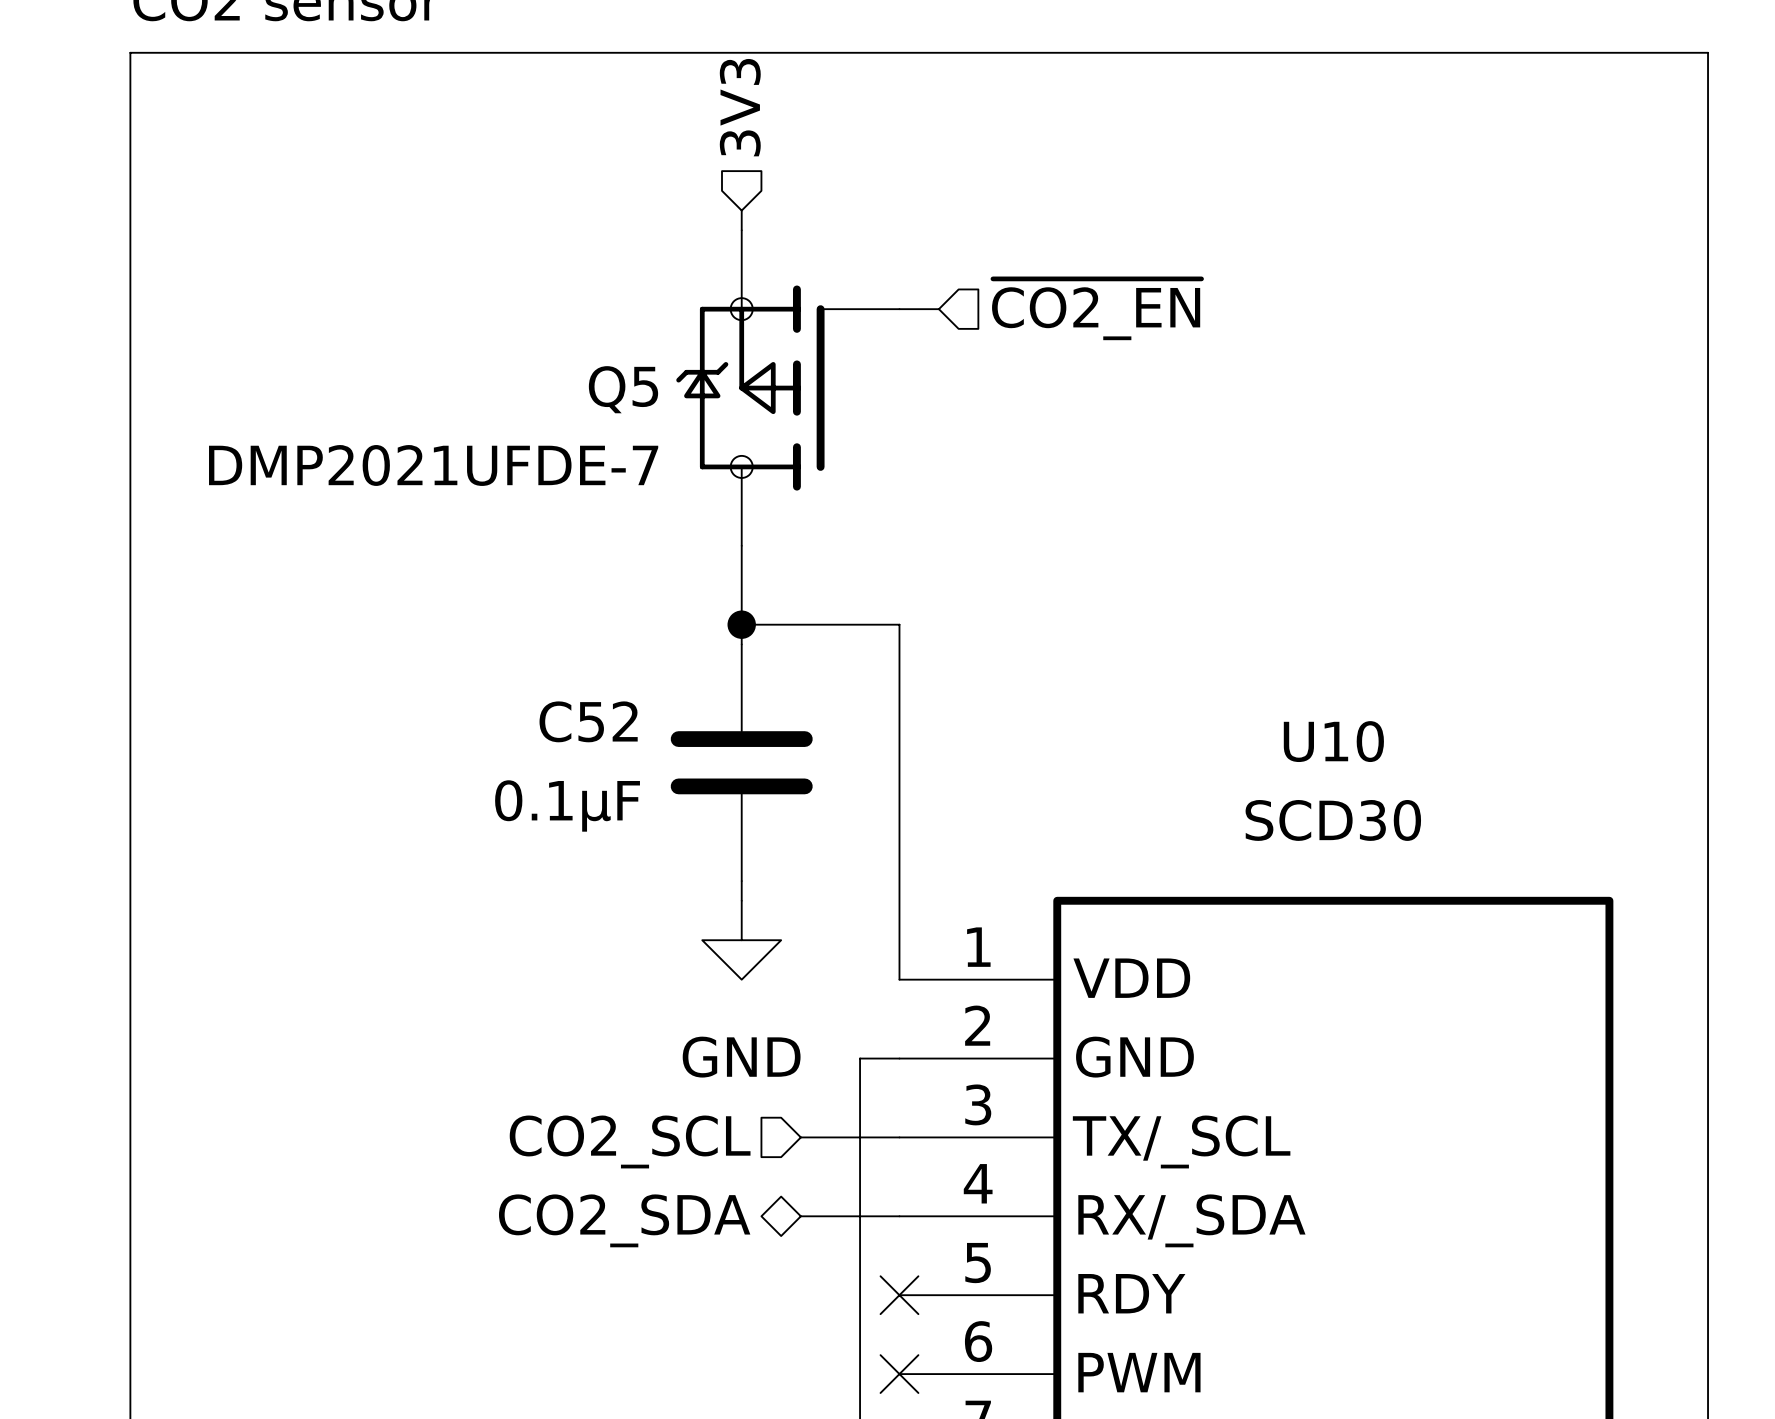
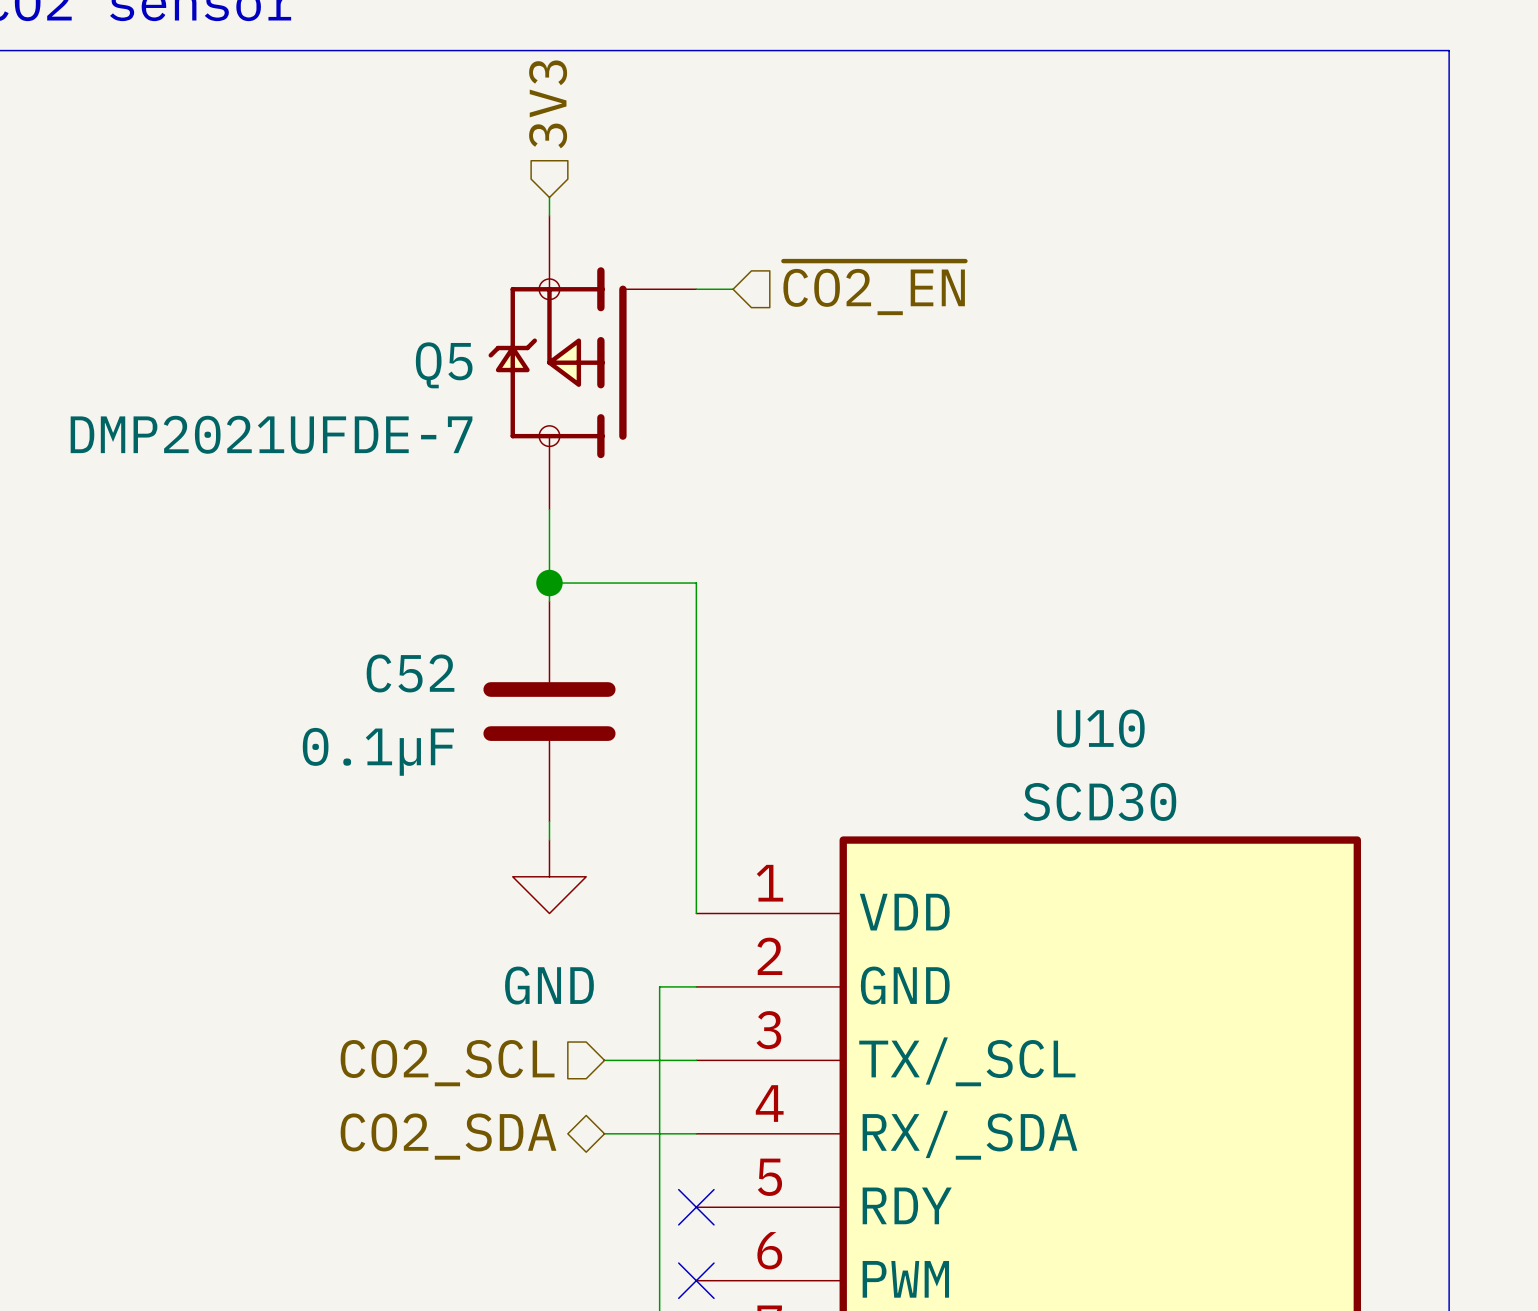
U10 name position: U10 (1333, 741) -> U10 (1100, 728)
U10 value position: SCD30 (1333, 820) -> SCD30 (1099, 801)

